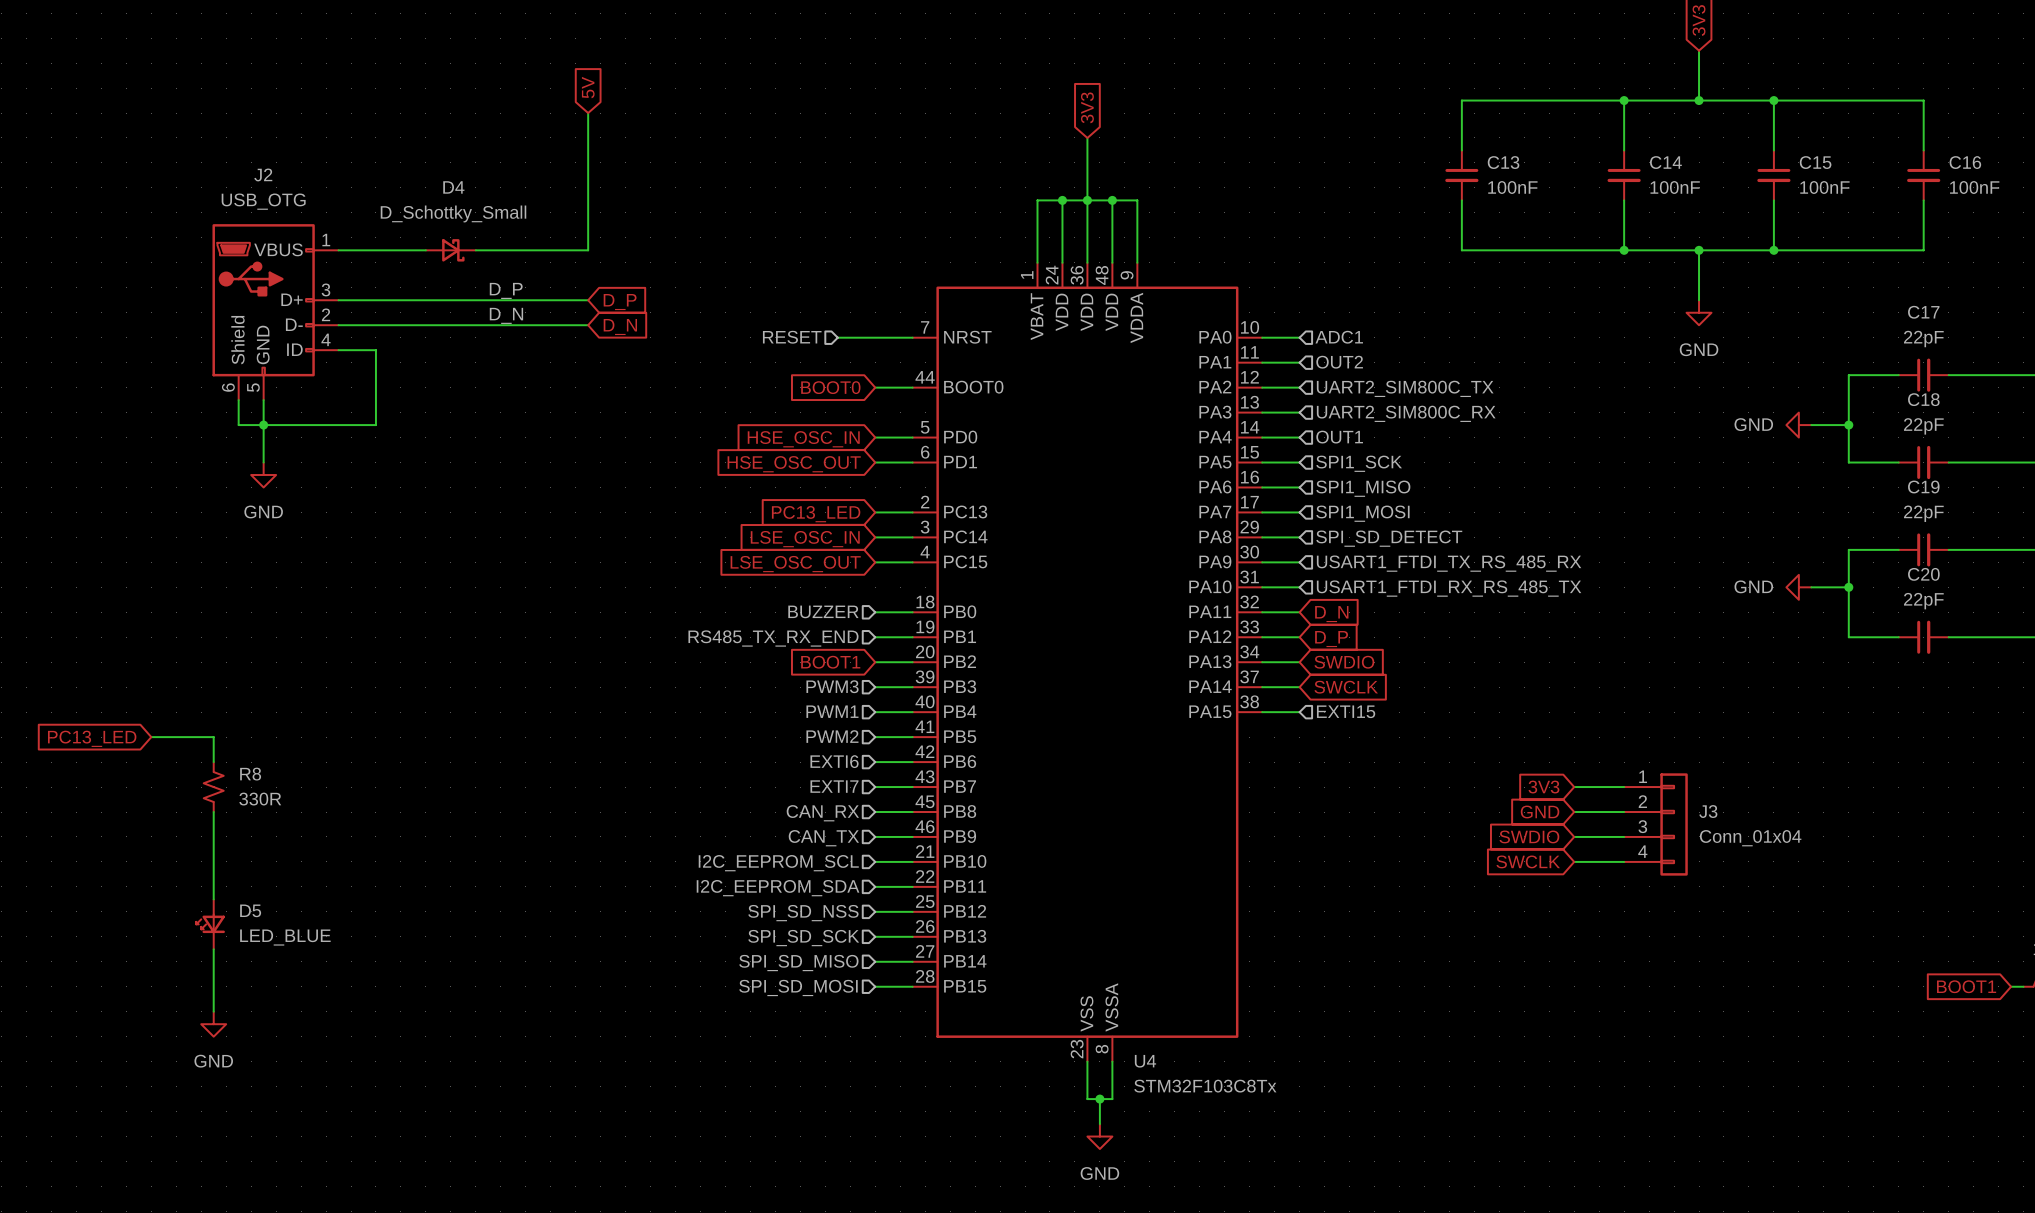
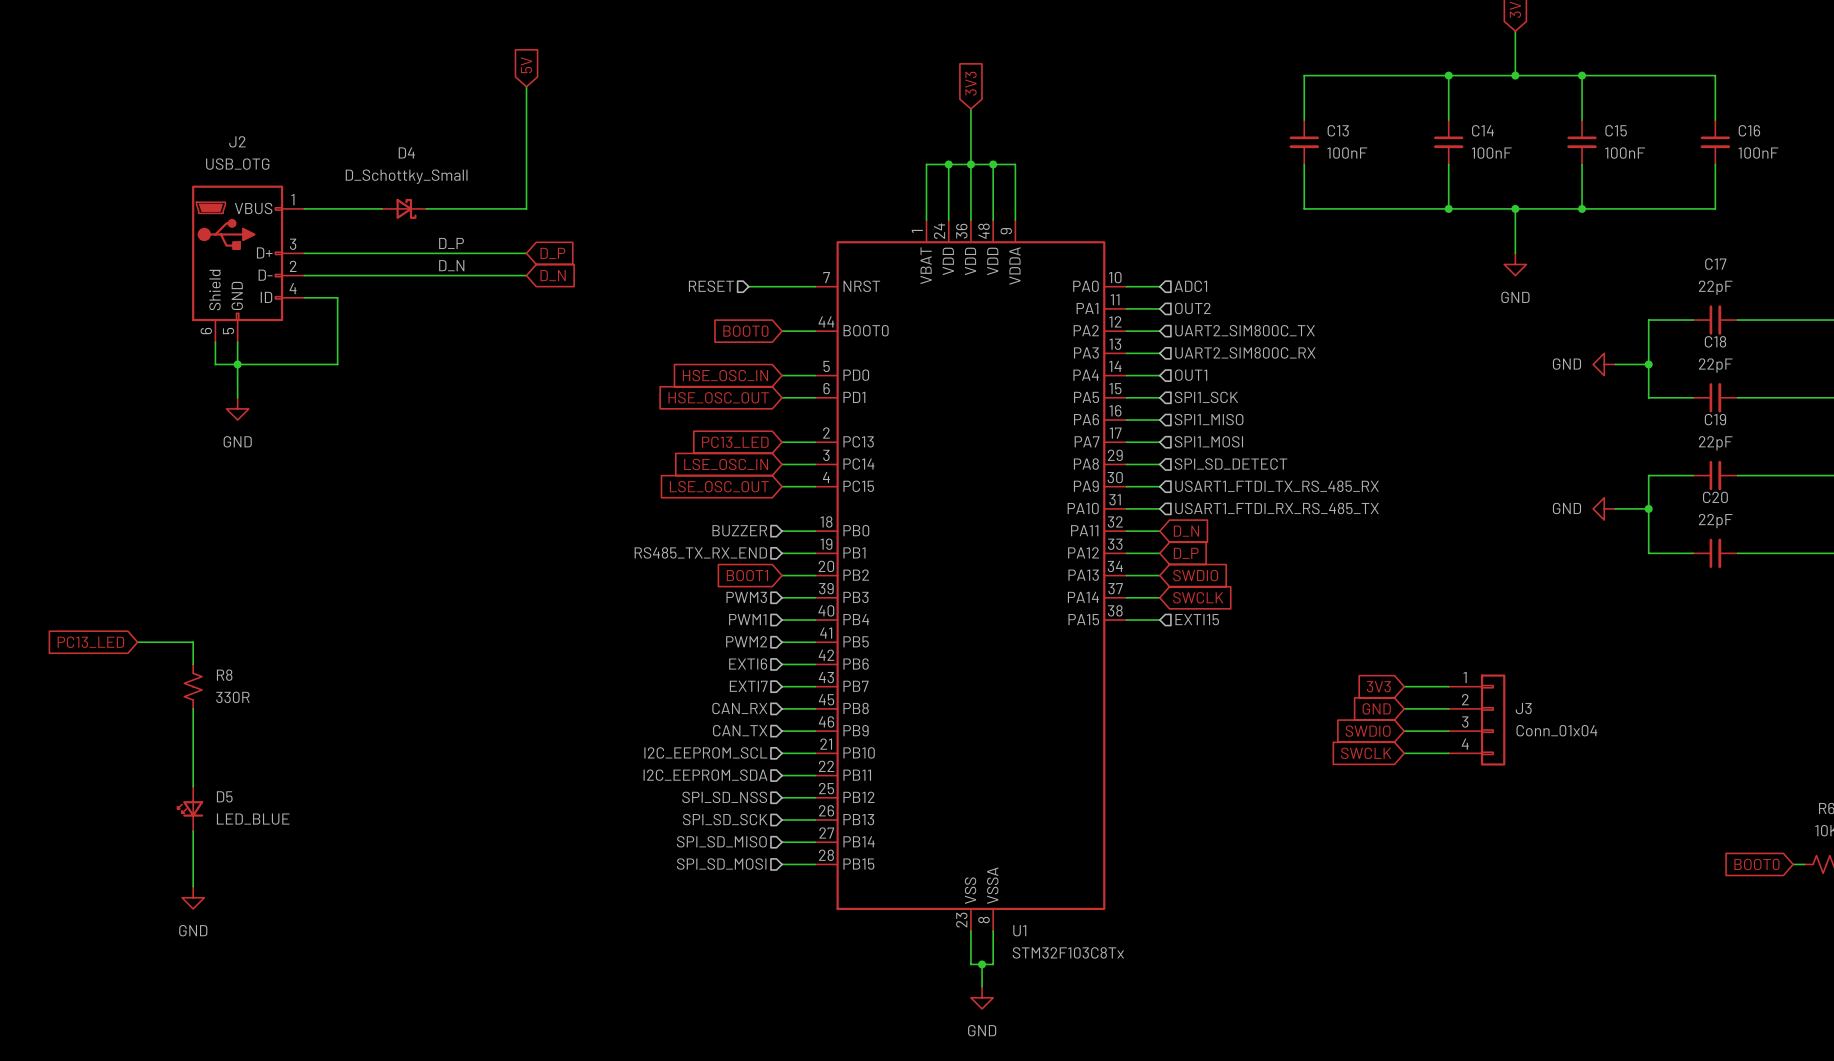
global label: BOOT1 (1966, 986) -> BOOT0 (1756, 864)
U4 name: U4 (1145, 1061) -> U1 (1019, 930)

